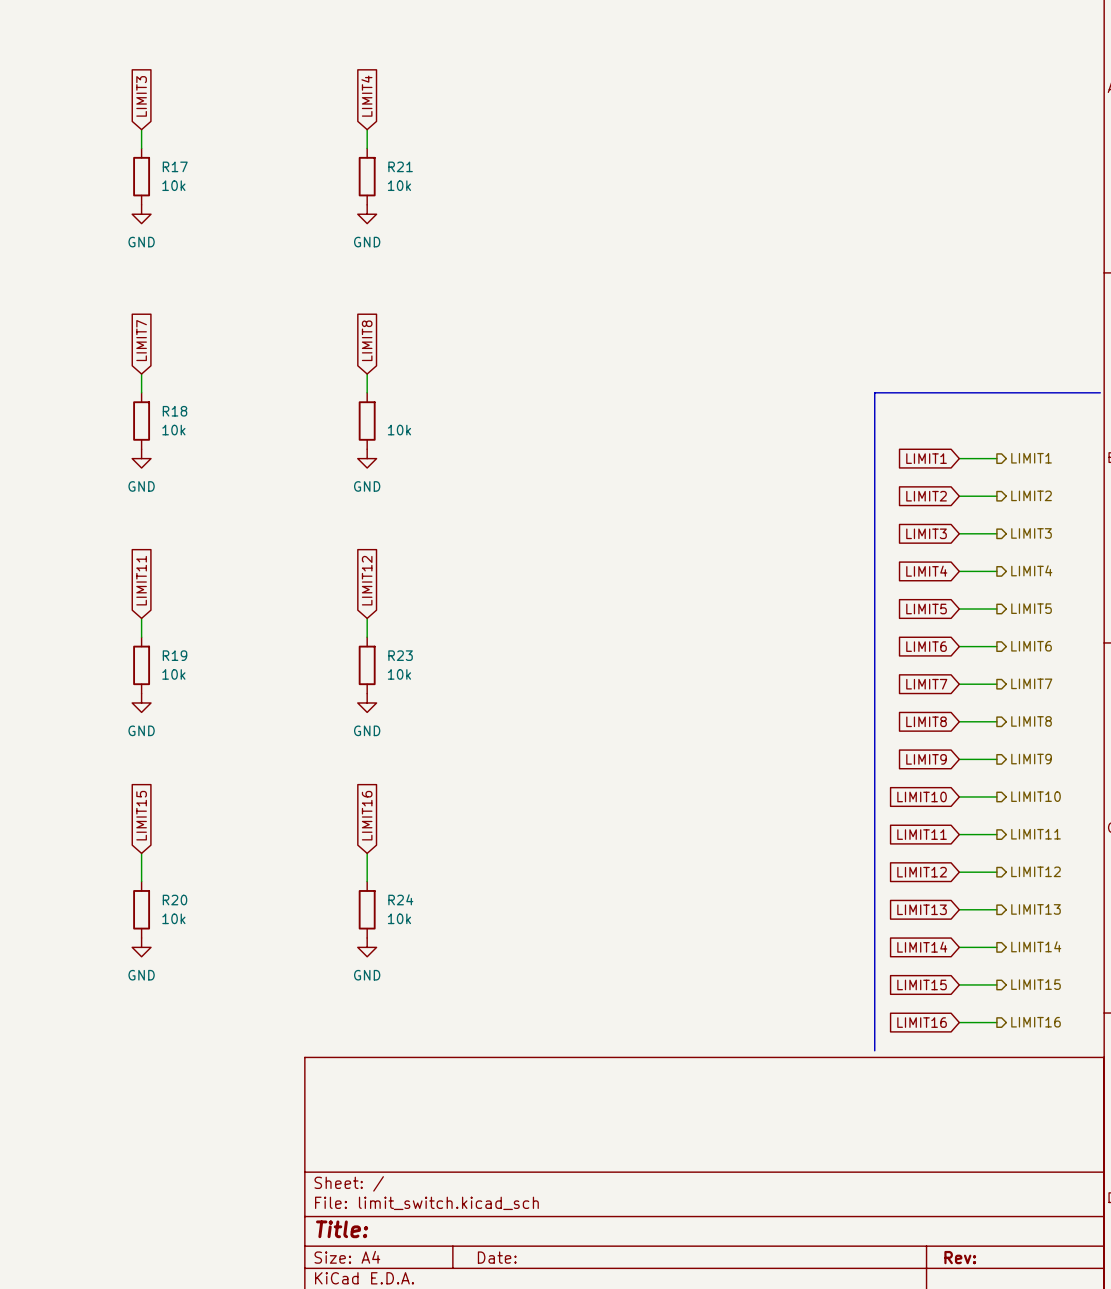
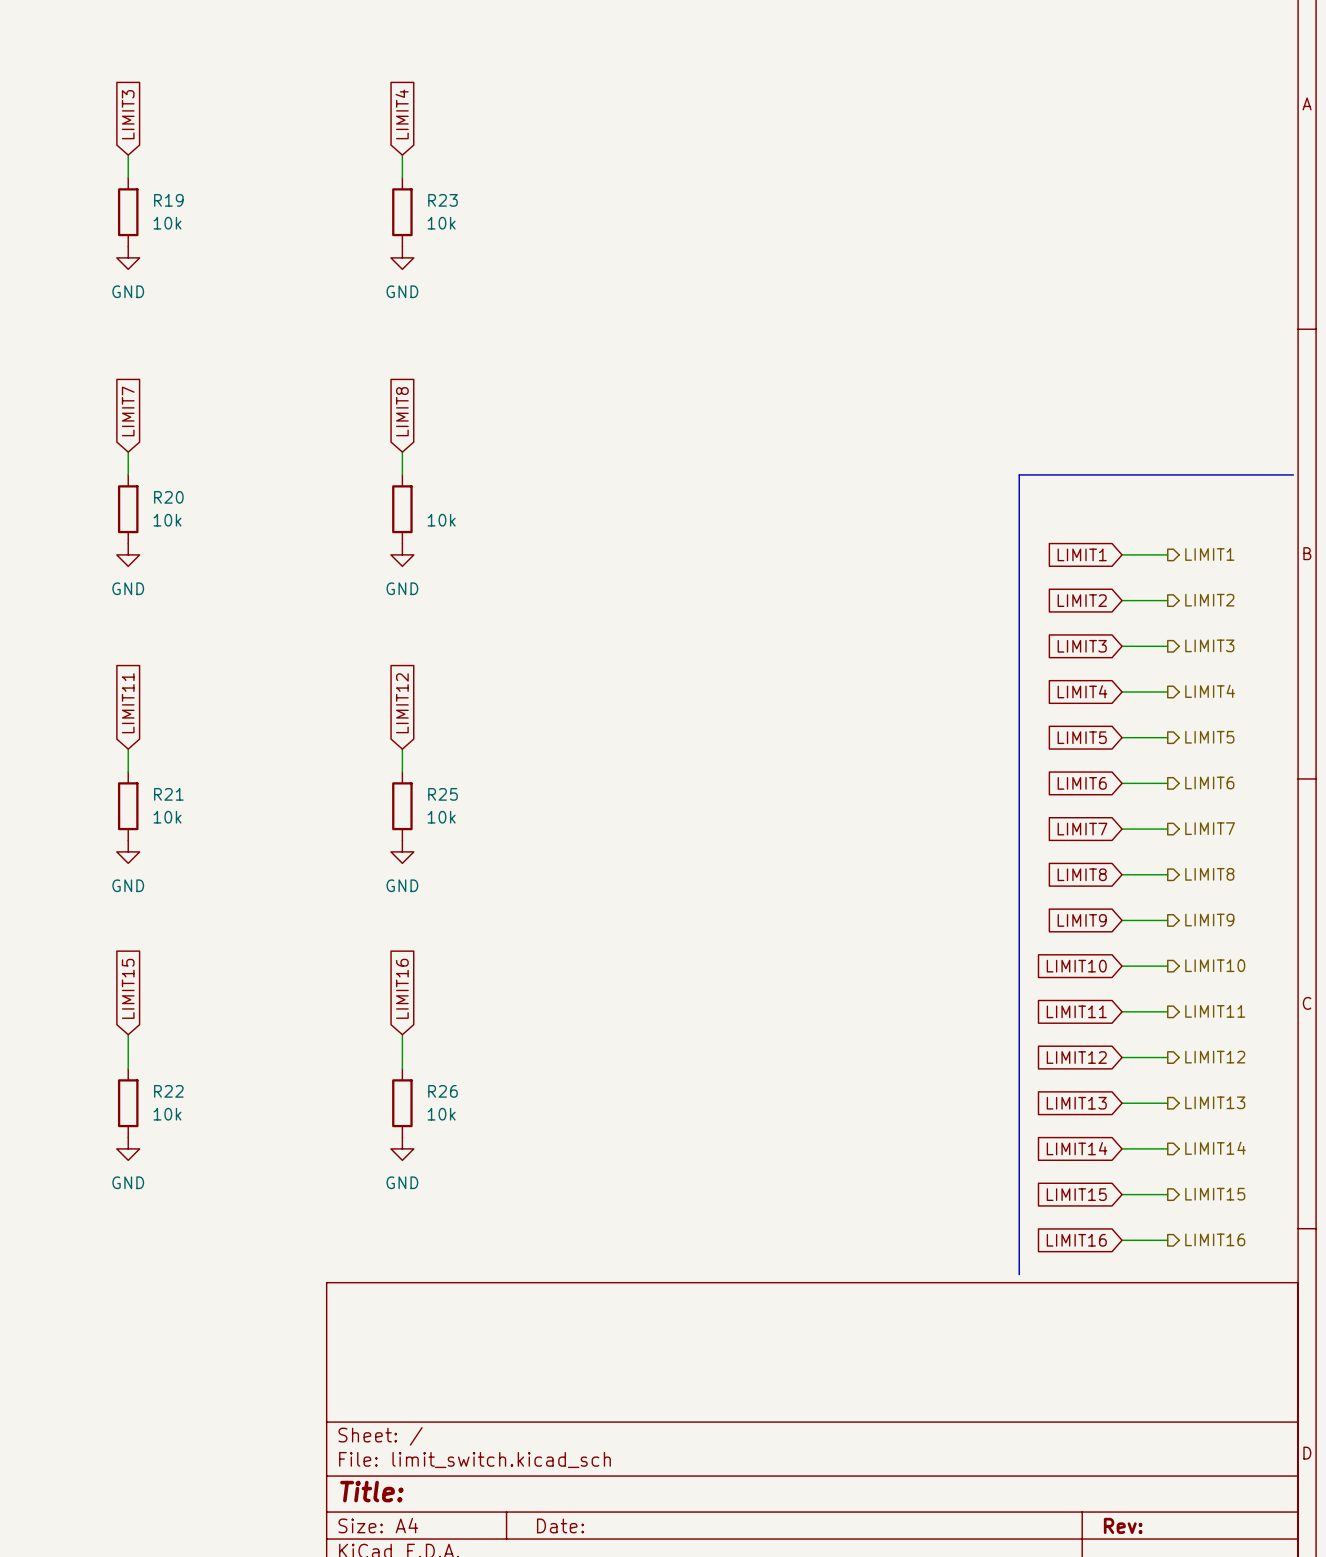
R17 name: R17 (175, 166) -> R19 (168, 200)
R21 name: R21 (400, 166) -> R23 (443, 200)
R18 name: R18 (175, 411) -> R20 (168, 497)
R19 name: R19 (175, 655) -> R21 (168, 794)
R23 name: R23 (400, 655) -> R25 (443, 794)
R24 name: R24 (400, 899) -> R26 (443, 1091)
R20 name: R20 (175, 900) -> R22 (168, 1091)

